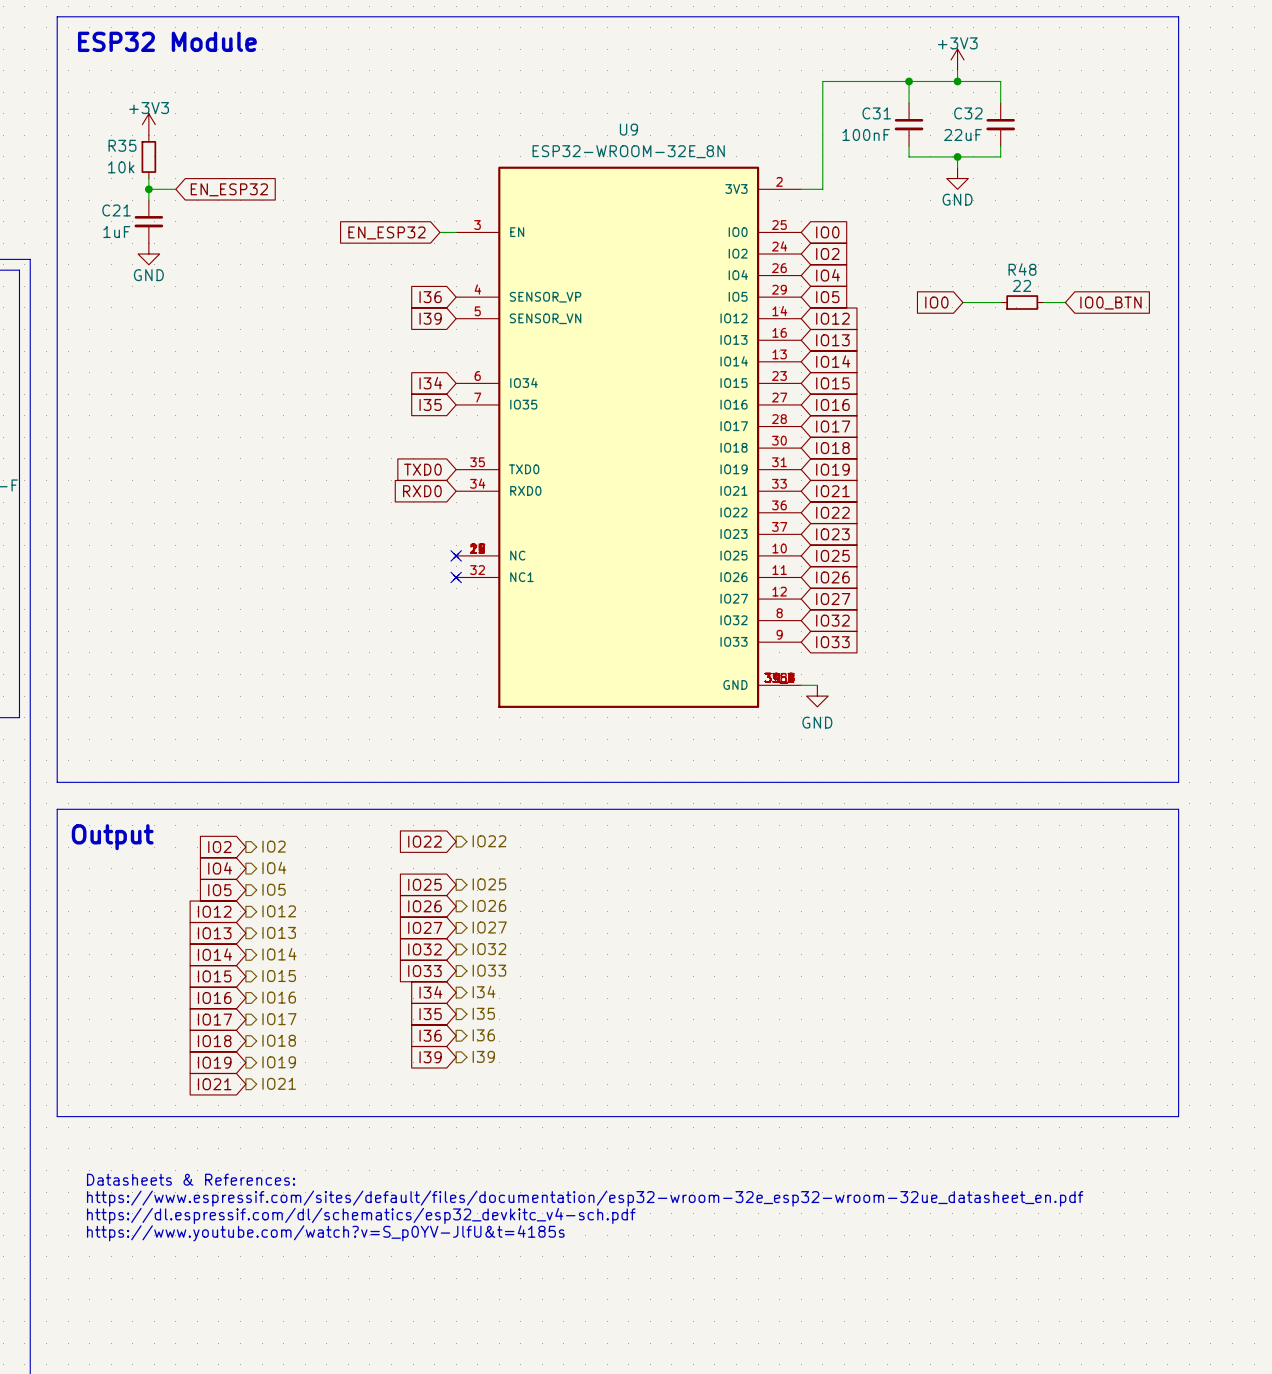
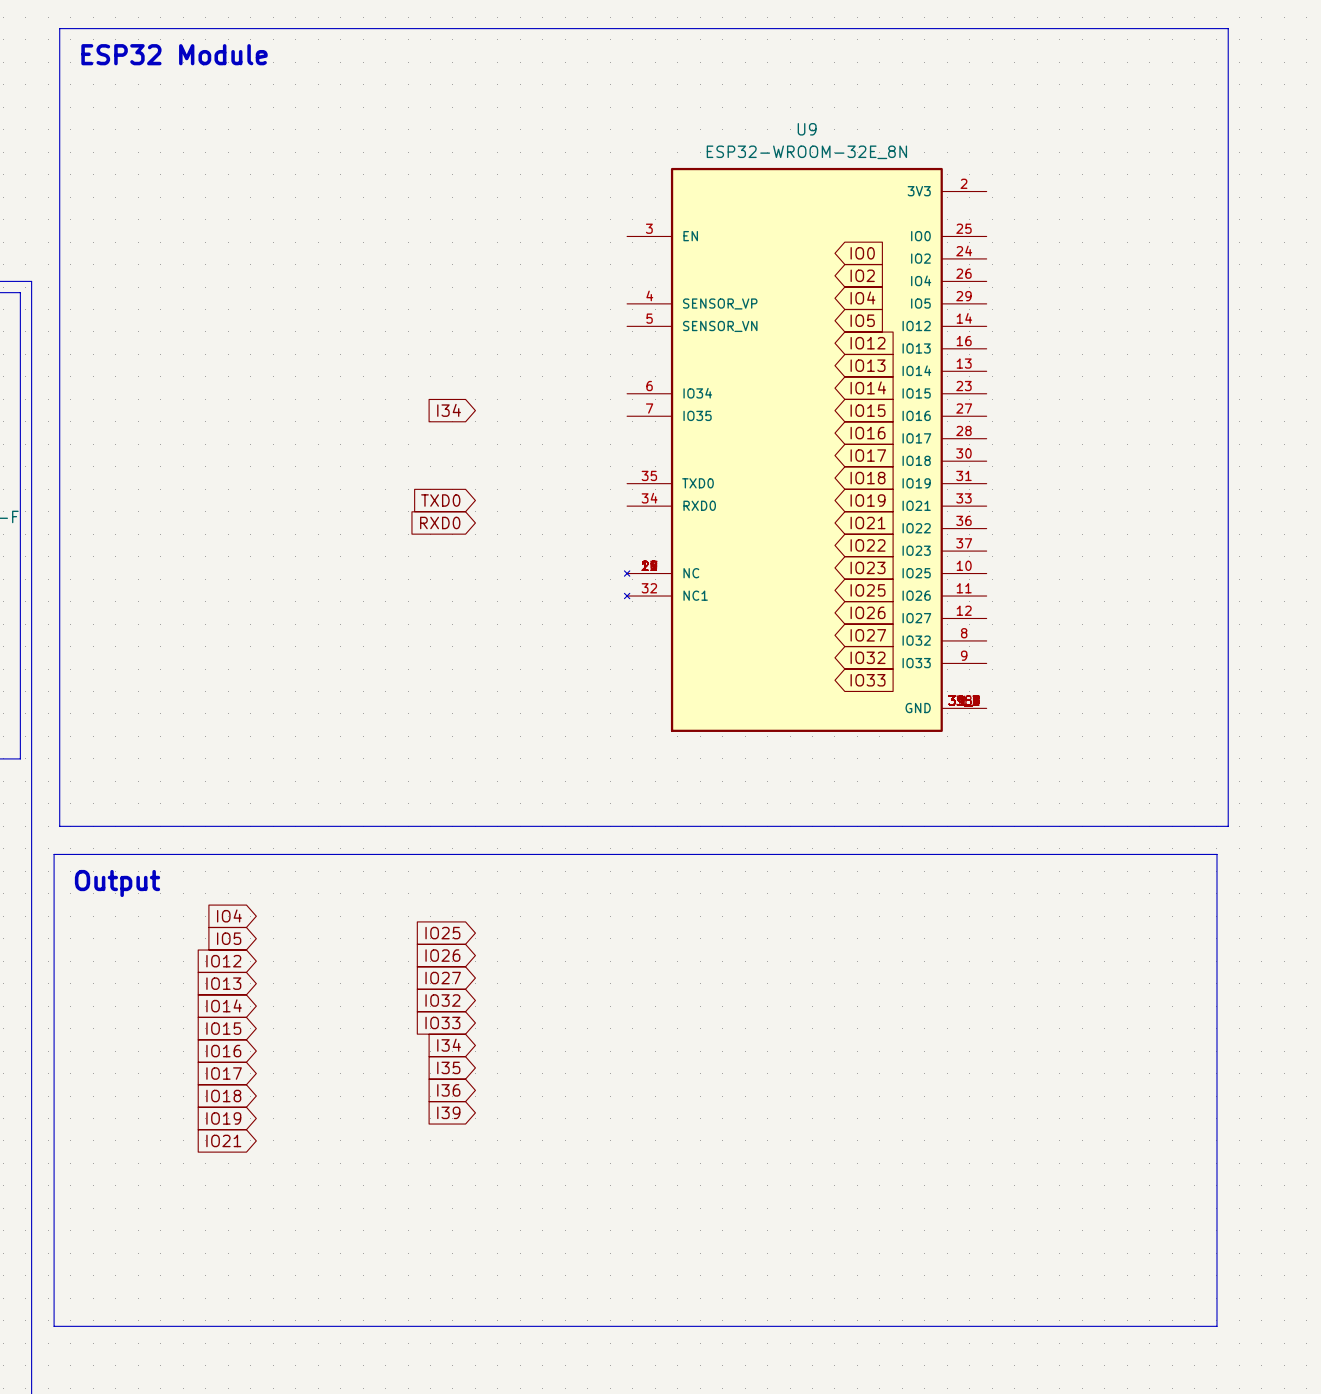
power symbol: +3V3 (957, 59) -> none
wire: (957, 70) (957, 81) -> none
wire: (909, 81) (909, 103) -> none
junction: (909, 81) -> none
junction: (957, 81) -> none
wire: (1000, 103) (1000, 81) (822, 81) (822, 189) (801, 189) -> none
power symbol: +3V3 (148, 124) -> none
C31: 100nF (909, 124) -> none
C32: 22uF (1000, 124) -> none
wire: (909, 146) (909, 156) (1000, 156) (1000, 146) -> none
R35: 10k (148, 156) -> none
wire: (957, 156) (957, 167) -> none
junction: (957, 156) -> none
wire: (148, 178) (148, 200) -> none
power symbol: GND (957, 178) -> none
wire: (148, 189) (175, 189) -> none
junction: (148, 189) -> none
global label: EN_ESP32 (229, 189) -> none
C21: 1uF (148, 221) -> none
global label: EN_ESP32 (386, 232) -> none
wire: (439, 232) (456, 232) -> none
power symbol: GND (148, 254) -> none
global label: I36 (430, 297) -> none
global label: IO0 (936, 302) -> none
wire: (962, 302) (1000, 302) -> none
R48: 22 (1022, 302) -> none
wire: (1043, 302) (1065, 302) -> none
global label: IO0_BTN (1110, 303) -> none
global label: I39 (430, 318) -> none
global label: I35 (430, 404) -> none
U9 position: (627, 437) -> (805, 449)
no-connect mark: (456, 555) -> none
no-connect mark: (456, 577) -> none
power symbol: GND (817, 696) -> none
line: (57, 809) (57, 1116) (1178, 1116) (1178, 809) (1167, 809) -> (59, 854) (54, 854) (54, 1326) (1216, 1326) (1216, 854)
global label: IO22 (424, 841) -> none
hierarchical label: IO22 (489, 841) -> none
hierarchical label: IO2 (274, 846) -> none
global label: IO2 (219, 847) -> none
hierarchical label: IO4 (274, 867) -> none
hierarchical label: IO25 (489, 884) -> none
hierarchical label: IO5 (274, 889) -> none
hierarchical label: IO26 (489, 905) -> none
hierarchical label: IO12 (279, 911) -> none
hierarchical label: IO27 (489, 927) -> none
hierarchical label: IO13 (279, 932) -> none
hierarchical label: IO32 (489, 949) -> none
hierarchical label: IO14 (279, 954) -> none
hierarchical label: IO33 (489, 970) -> none
hierarchical label: IO15 (279, 976) -> none
hierarchical label: I34 (484, 991) -> none
hierarchical label: IO16 (279, 997) -> none
hierarchical label: I35 (483, 1013) -> none
hierarchical label: IO17 (279, 1019) -> none
hierarchical label: I36 (483, 1035) -> none
hierarchical label: IO18 (279, 1040) -> none
hierarchical label: I39 (483, 1056) -> none
hierarchical label: IO19 (279, 1062) -> none
hierarchical label: IO21 (279, 1083) -> none
text: Datasheets & References: (191, 1179) -> none
text: https://www.espressif.com/sites/default/files/documentation/esp32-wroom-32e_esp32-wroom-32ue_datasheet_en.pdf (585, 1198) -> none
text: https://dl.espressif.com/dl/schematics/esp32_devkitc_v4-sch.pdf (361, 1215) -> none
text: https://www.youtube.com/watch?v=S_p0YV-JlfU&t=4185s (325, 1233) -> none

